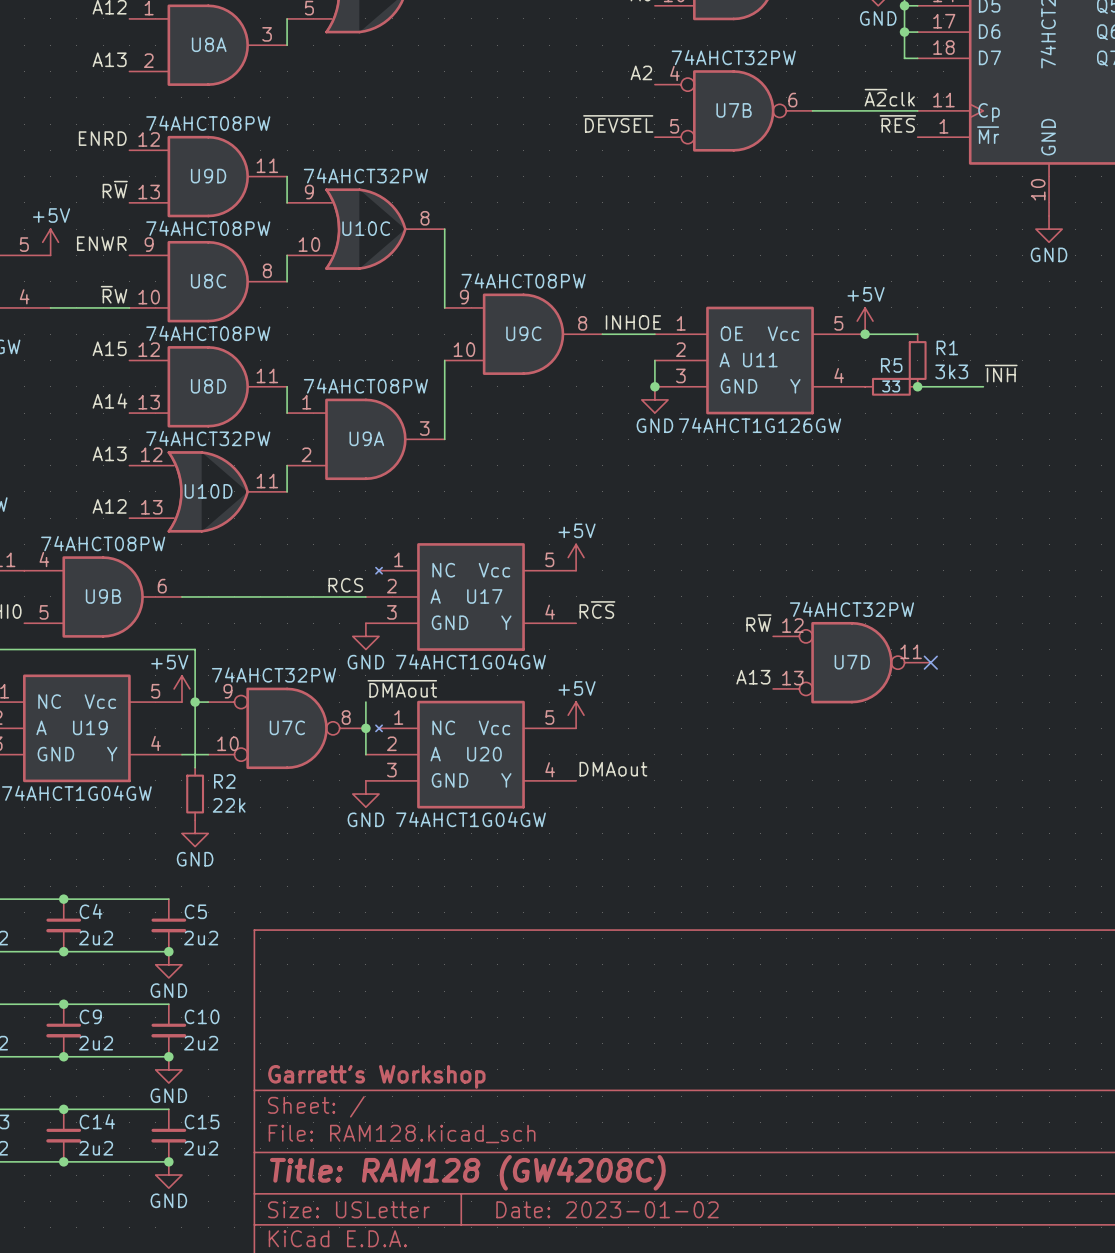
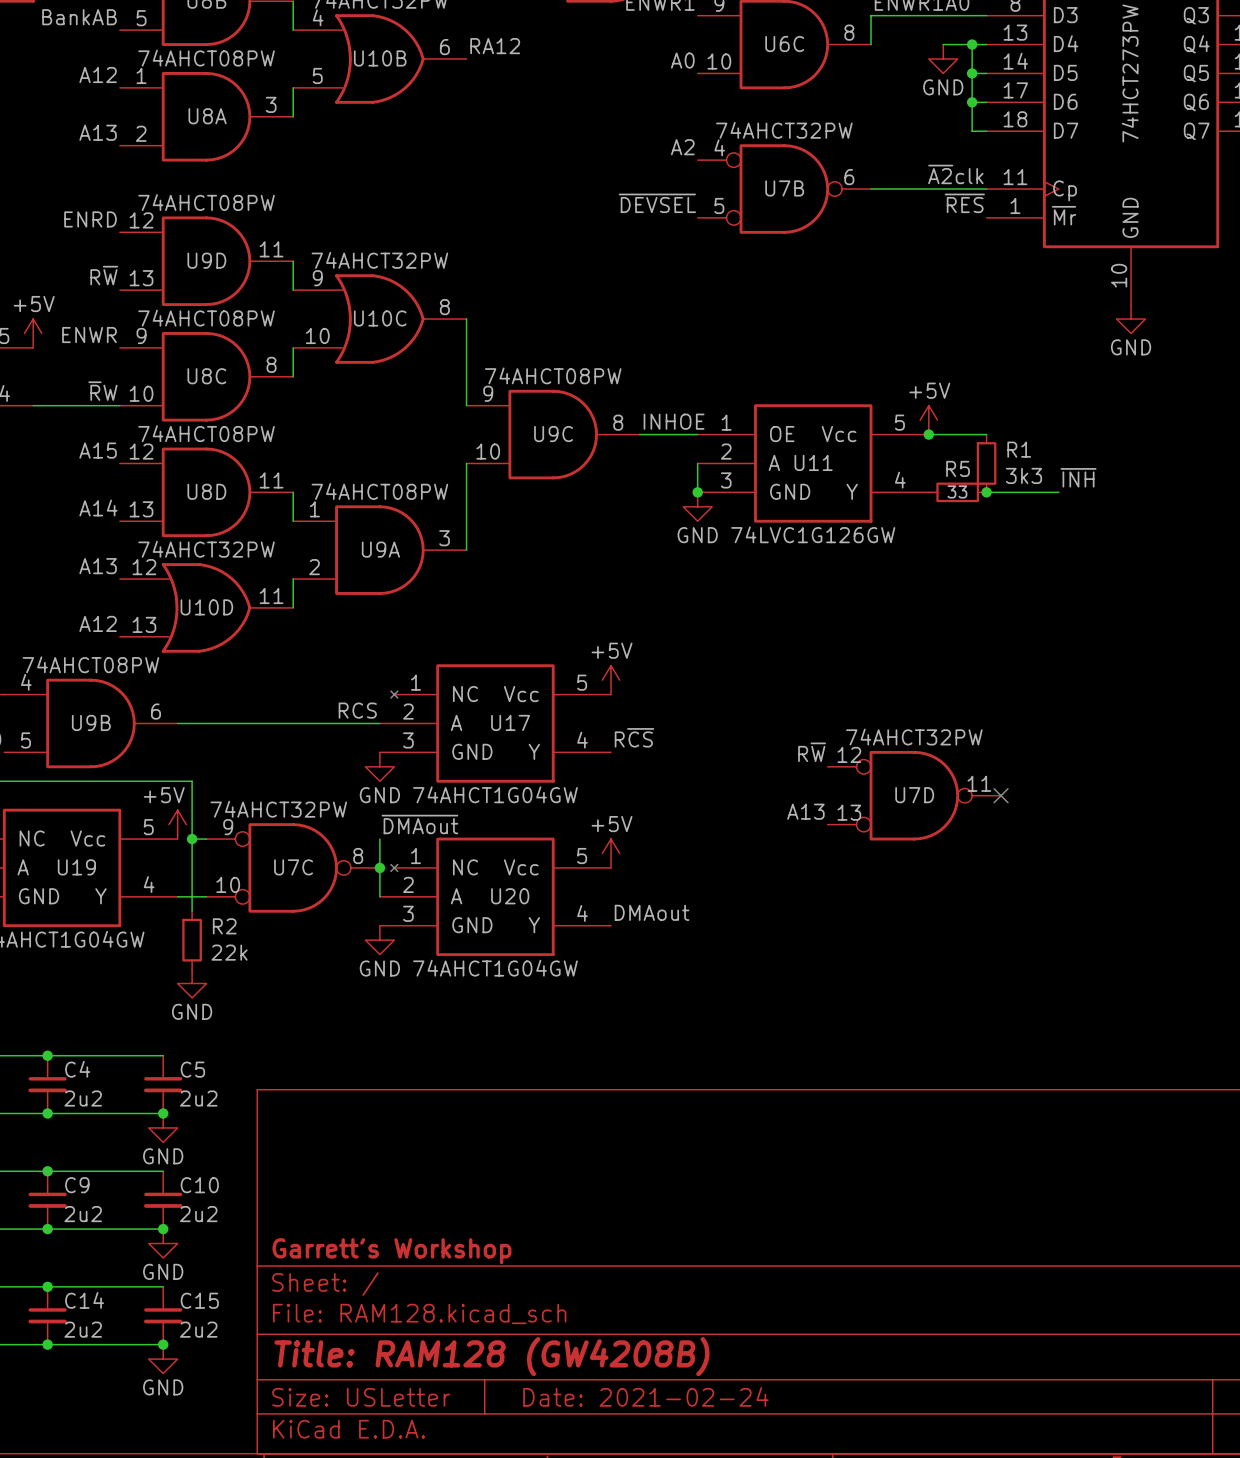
U11 value: 74AHCT1G126GW (760, 425) -> 74LVC1G126GW (813, 534)
title block: Title: RAM128 (GW4208C) (467, 1172) -> Title: RAM128 (GW4208B) (492, 1356)
title block: Date: 2023-01-02 (607, 1209) -> Date: 2021-02-24 (645, 1396)

